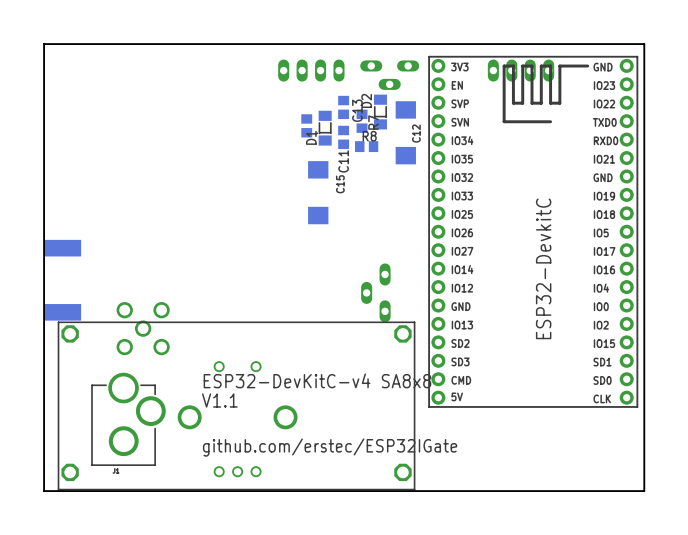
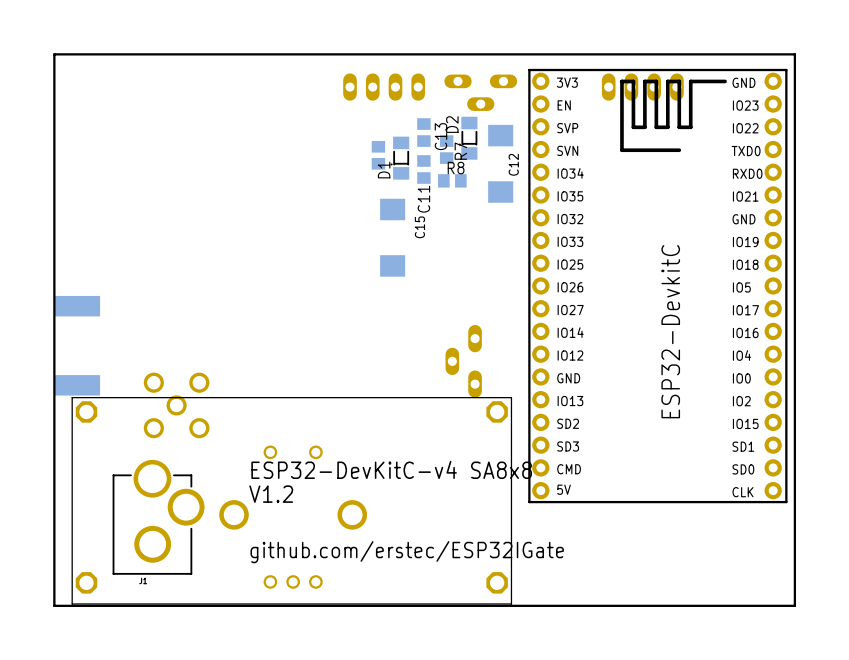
text: V1.1 (219, 400) -> V1.2 (271, 494)

